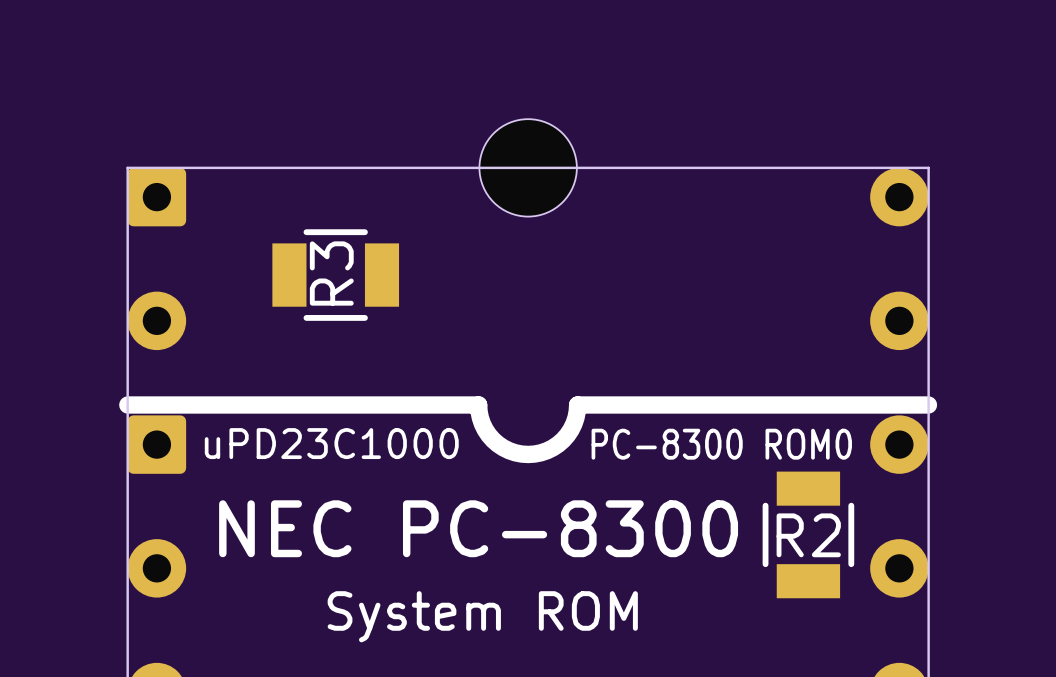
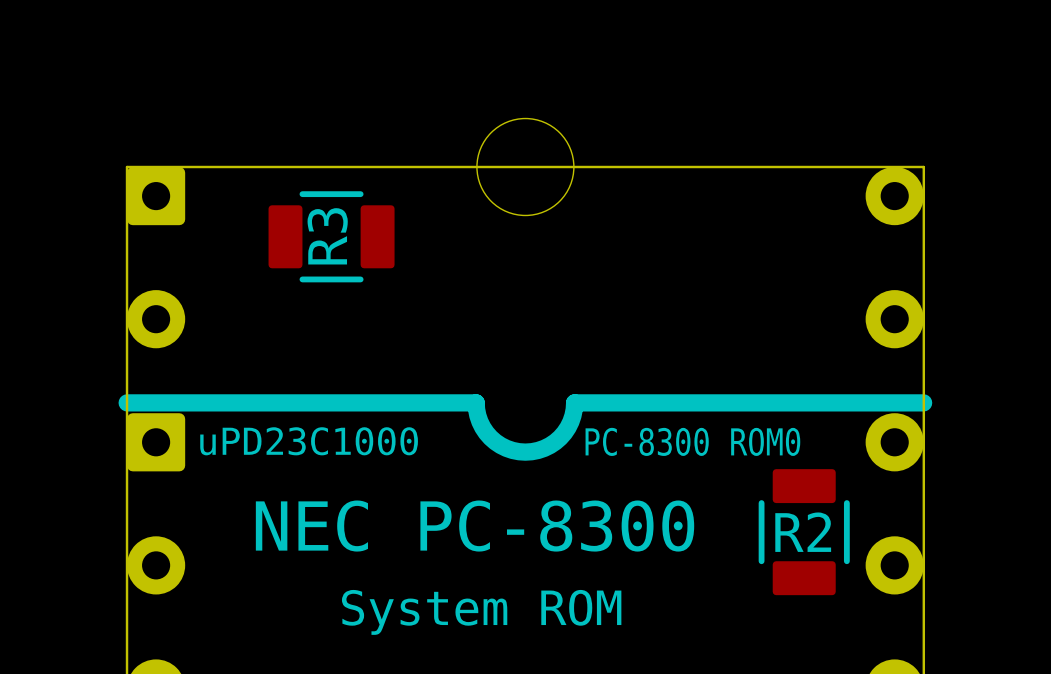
R3 footprint: [272, 229, 400, 321] -> [268, 191, 395, 283]
R3 name position: R3 (331, 273) -> R3 (327, 236)
R2 footprint: [762, 471, 855, 599] -> [758, 469, 850, 596]

